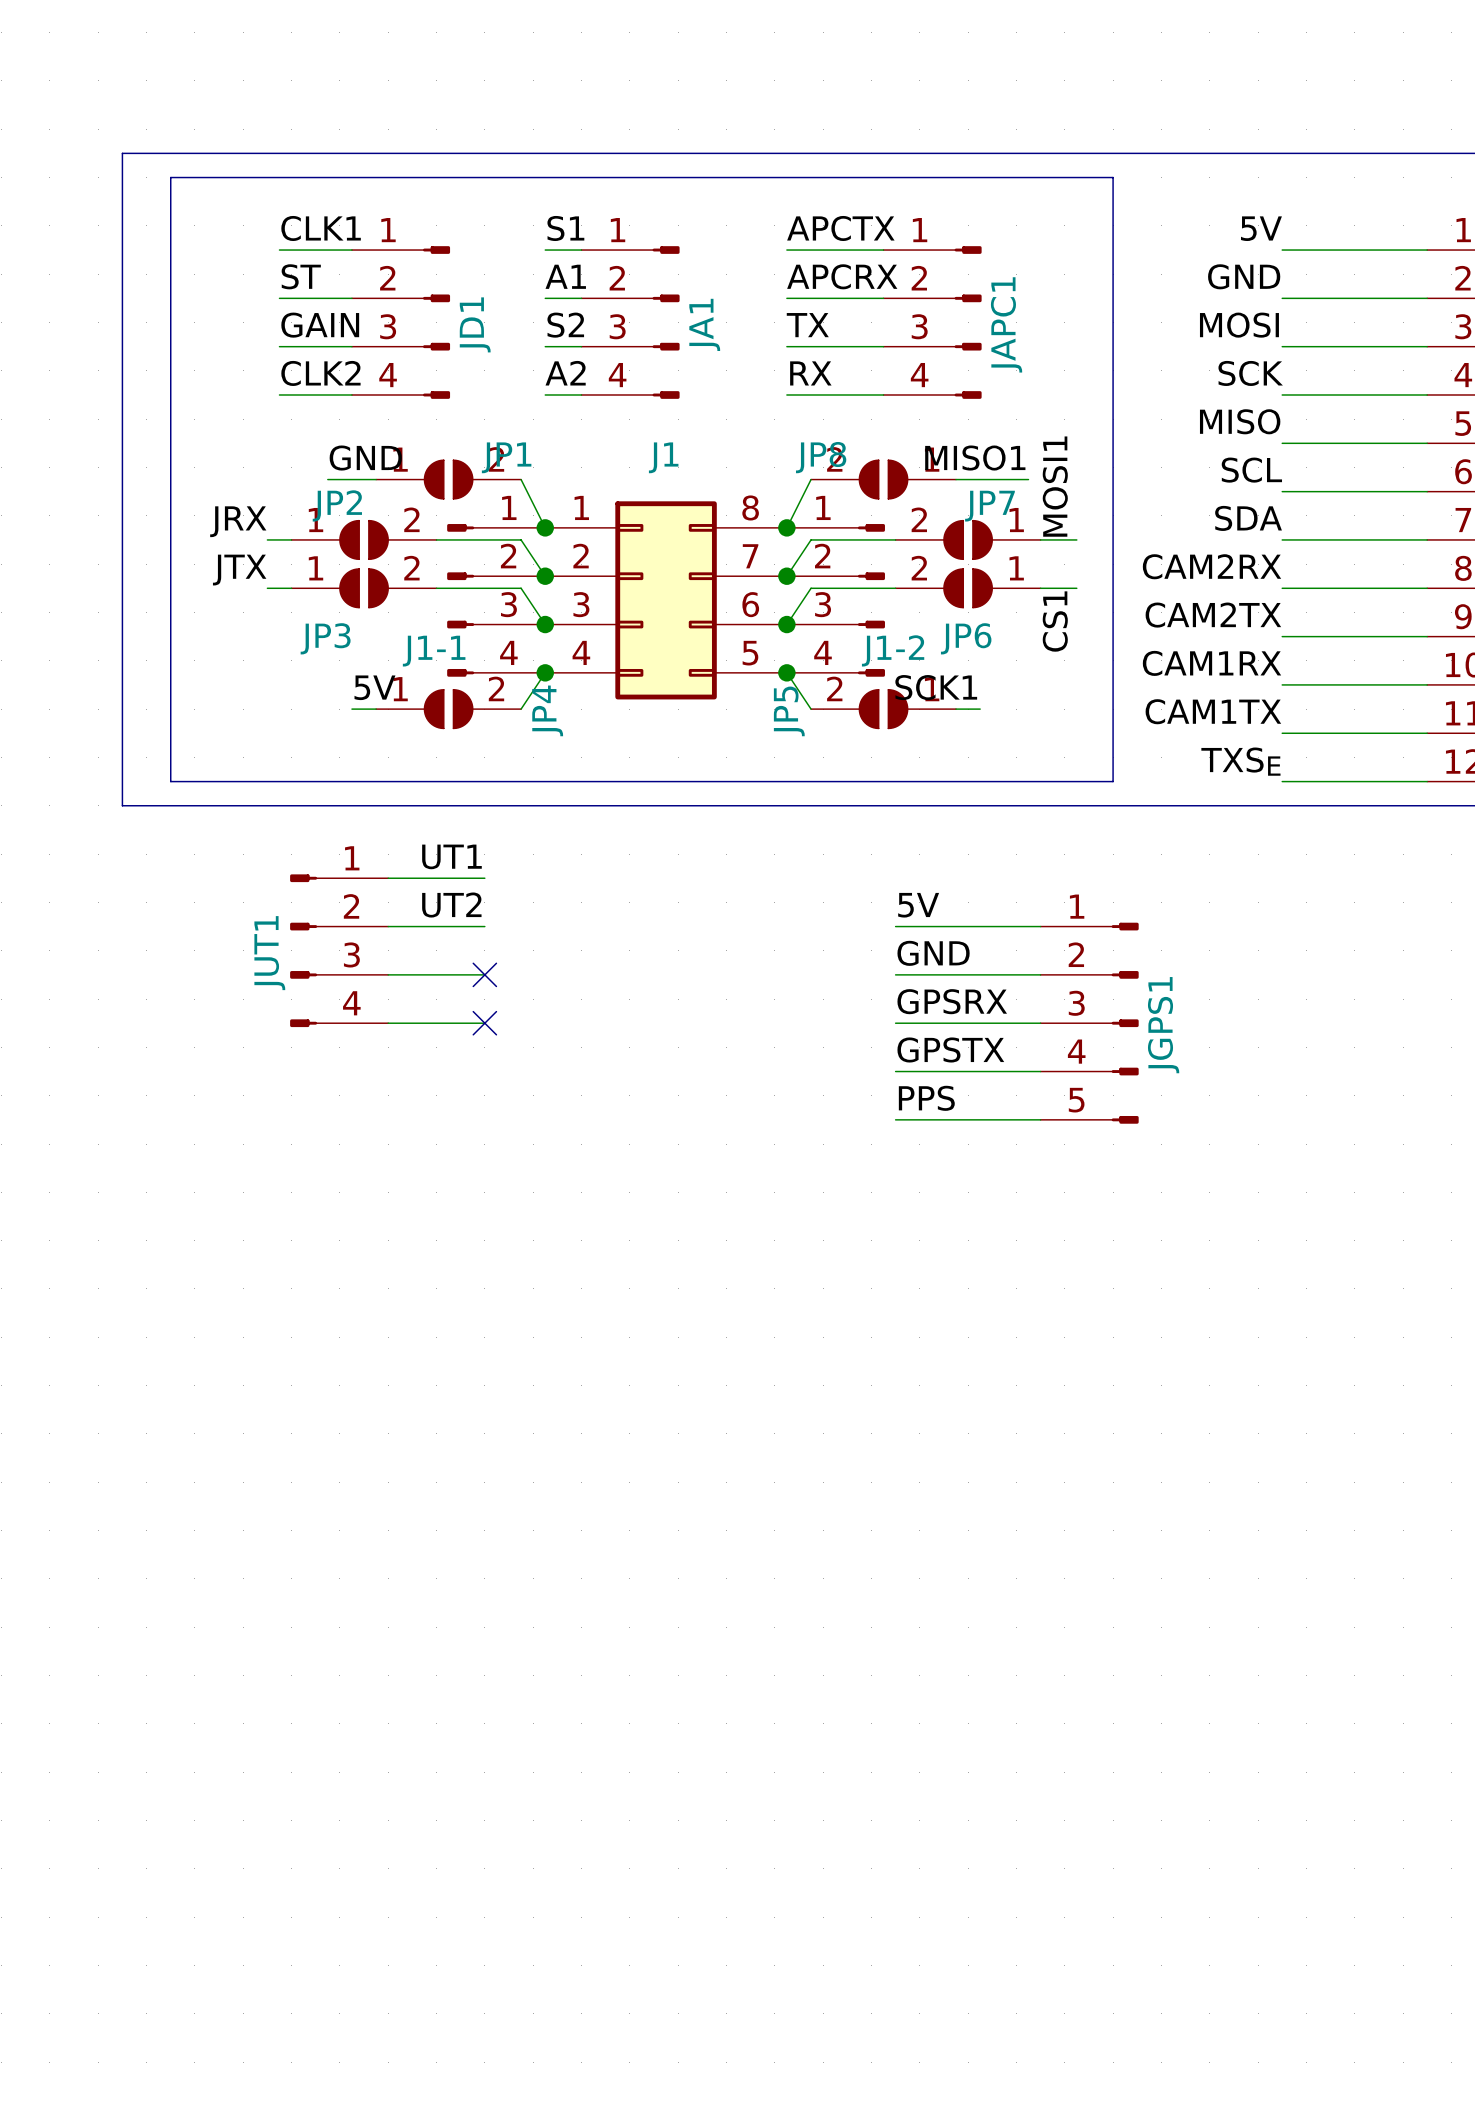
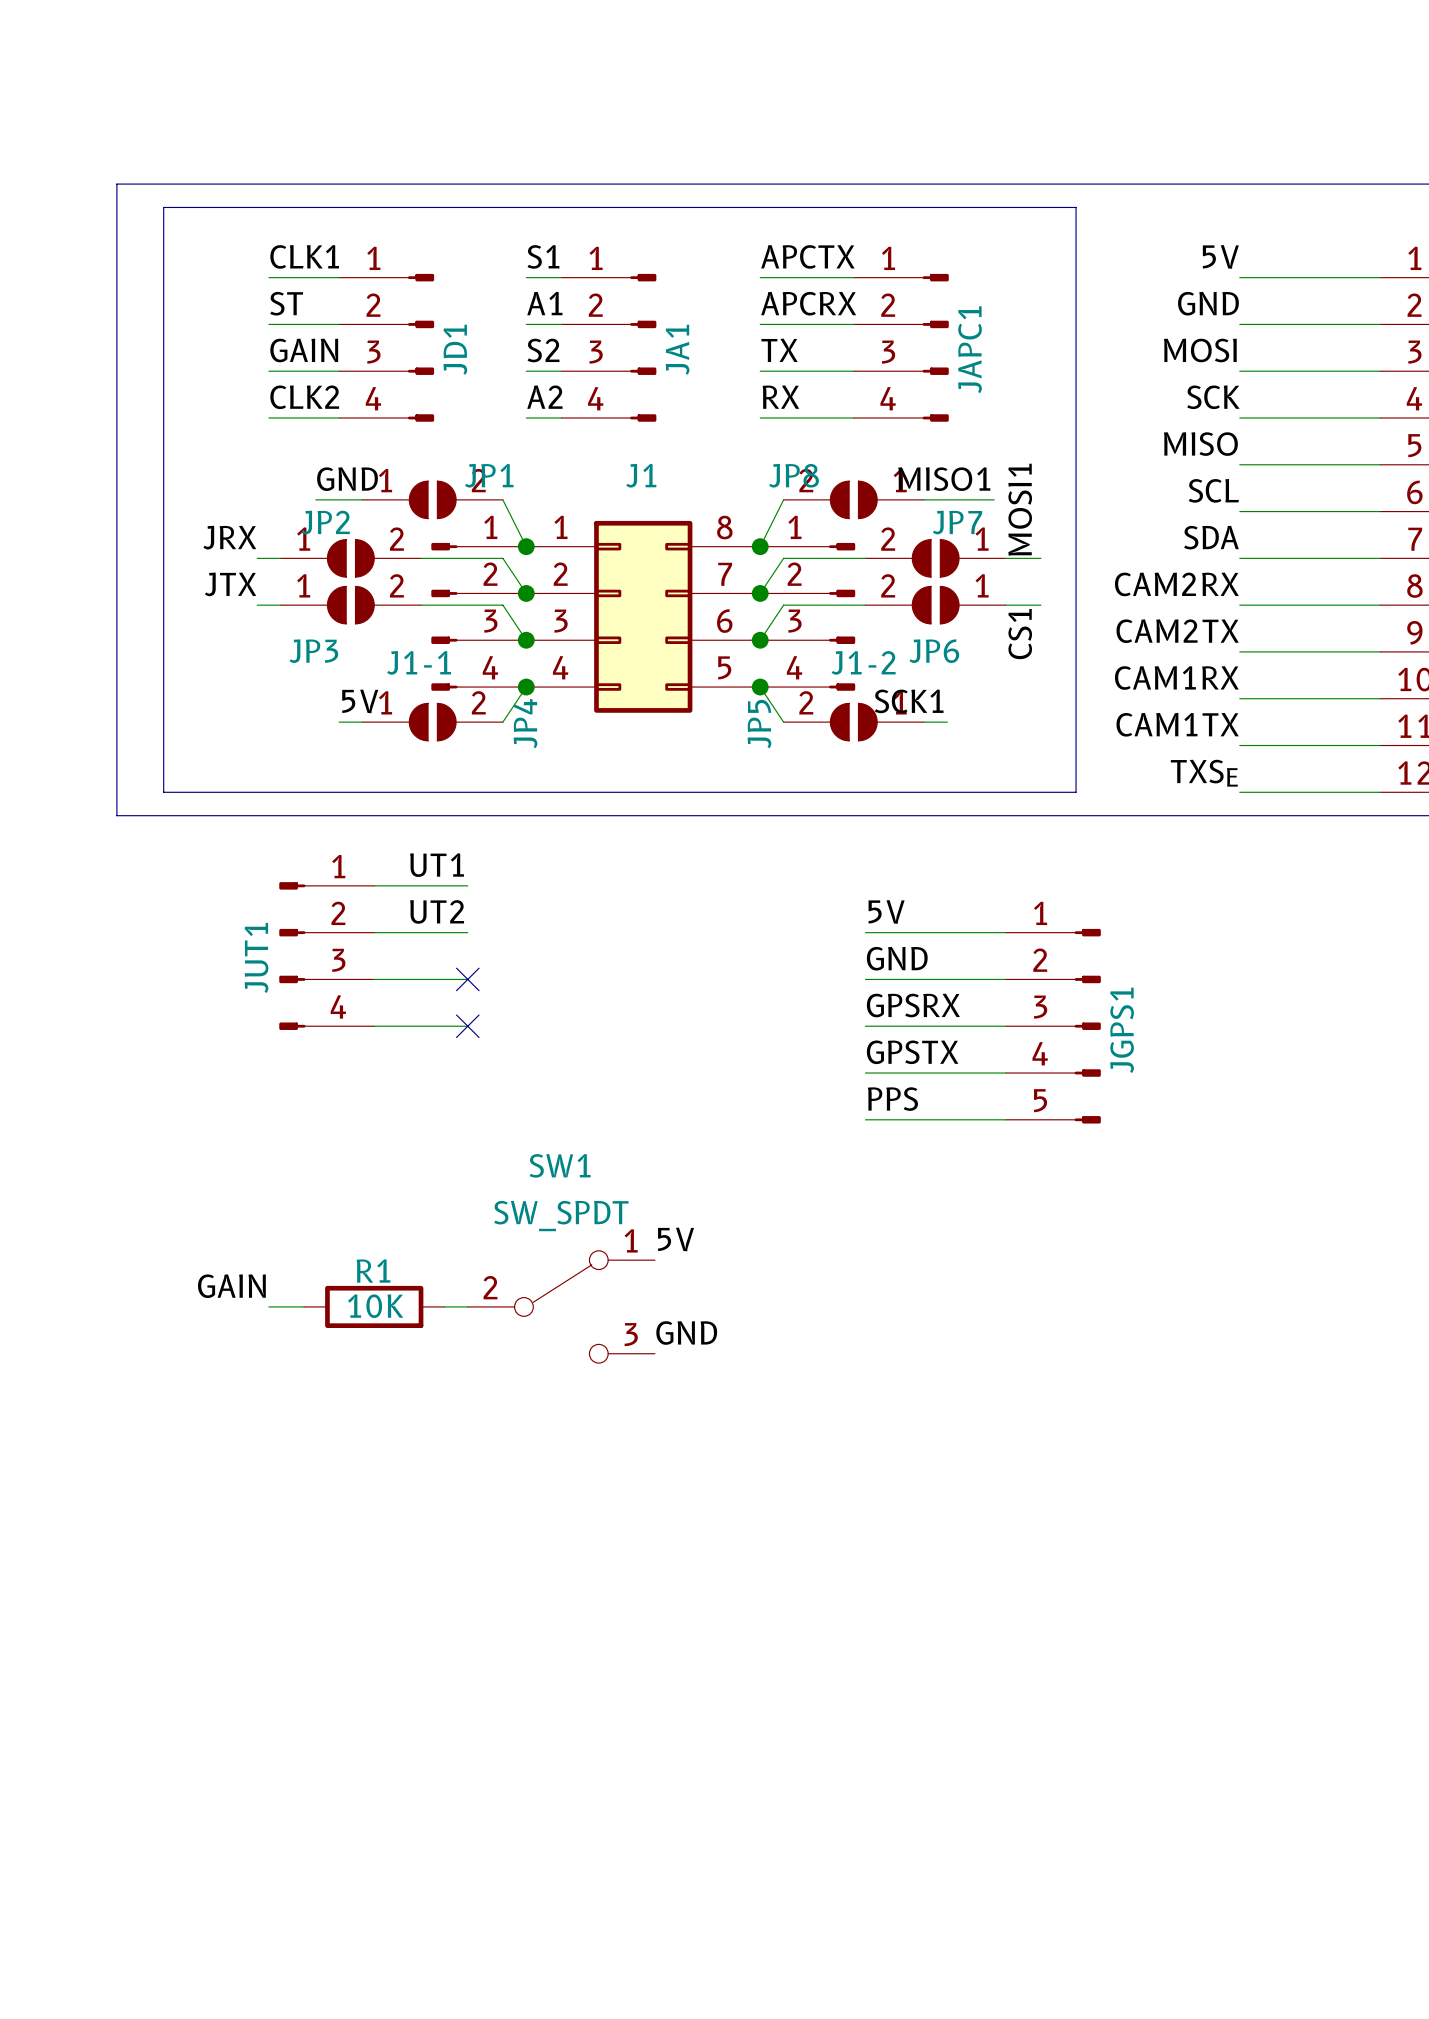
label: none -> 5V (676, 1239)
label: none -> GAIN (231, 1286)
wire: none -> (268, 1306) (304, 1306)
R1: none -> 10K (374, 1306)
wire: none -> (444, 1306) (467, 1306)
SW1: none -> SW_SPDT (561, 1306)
label: none -> GND (686, 1332)

